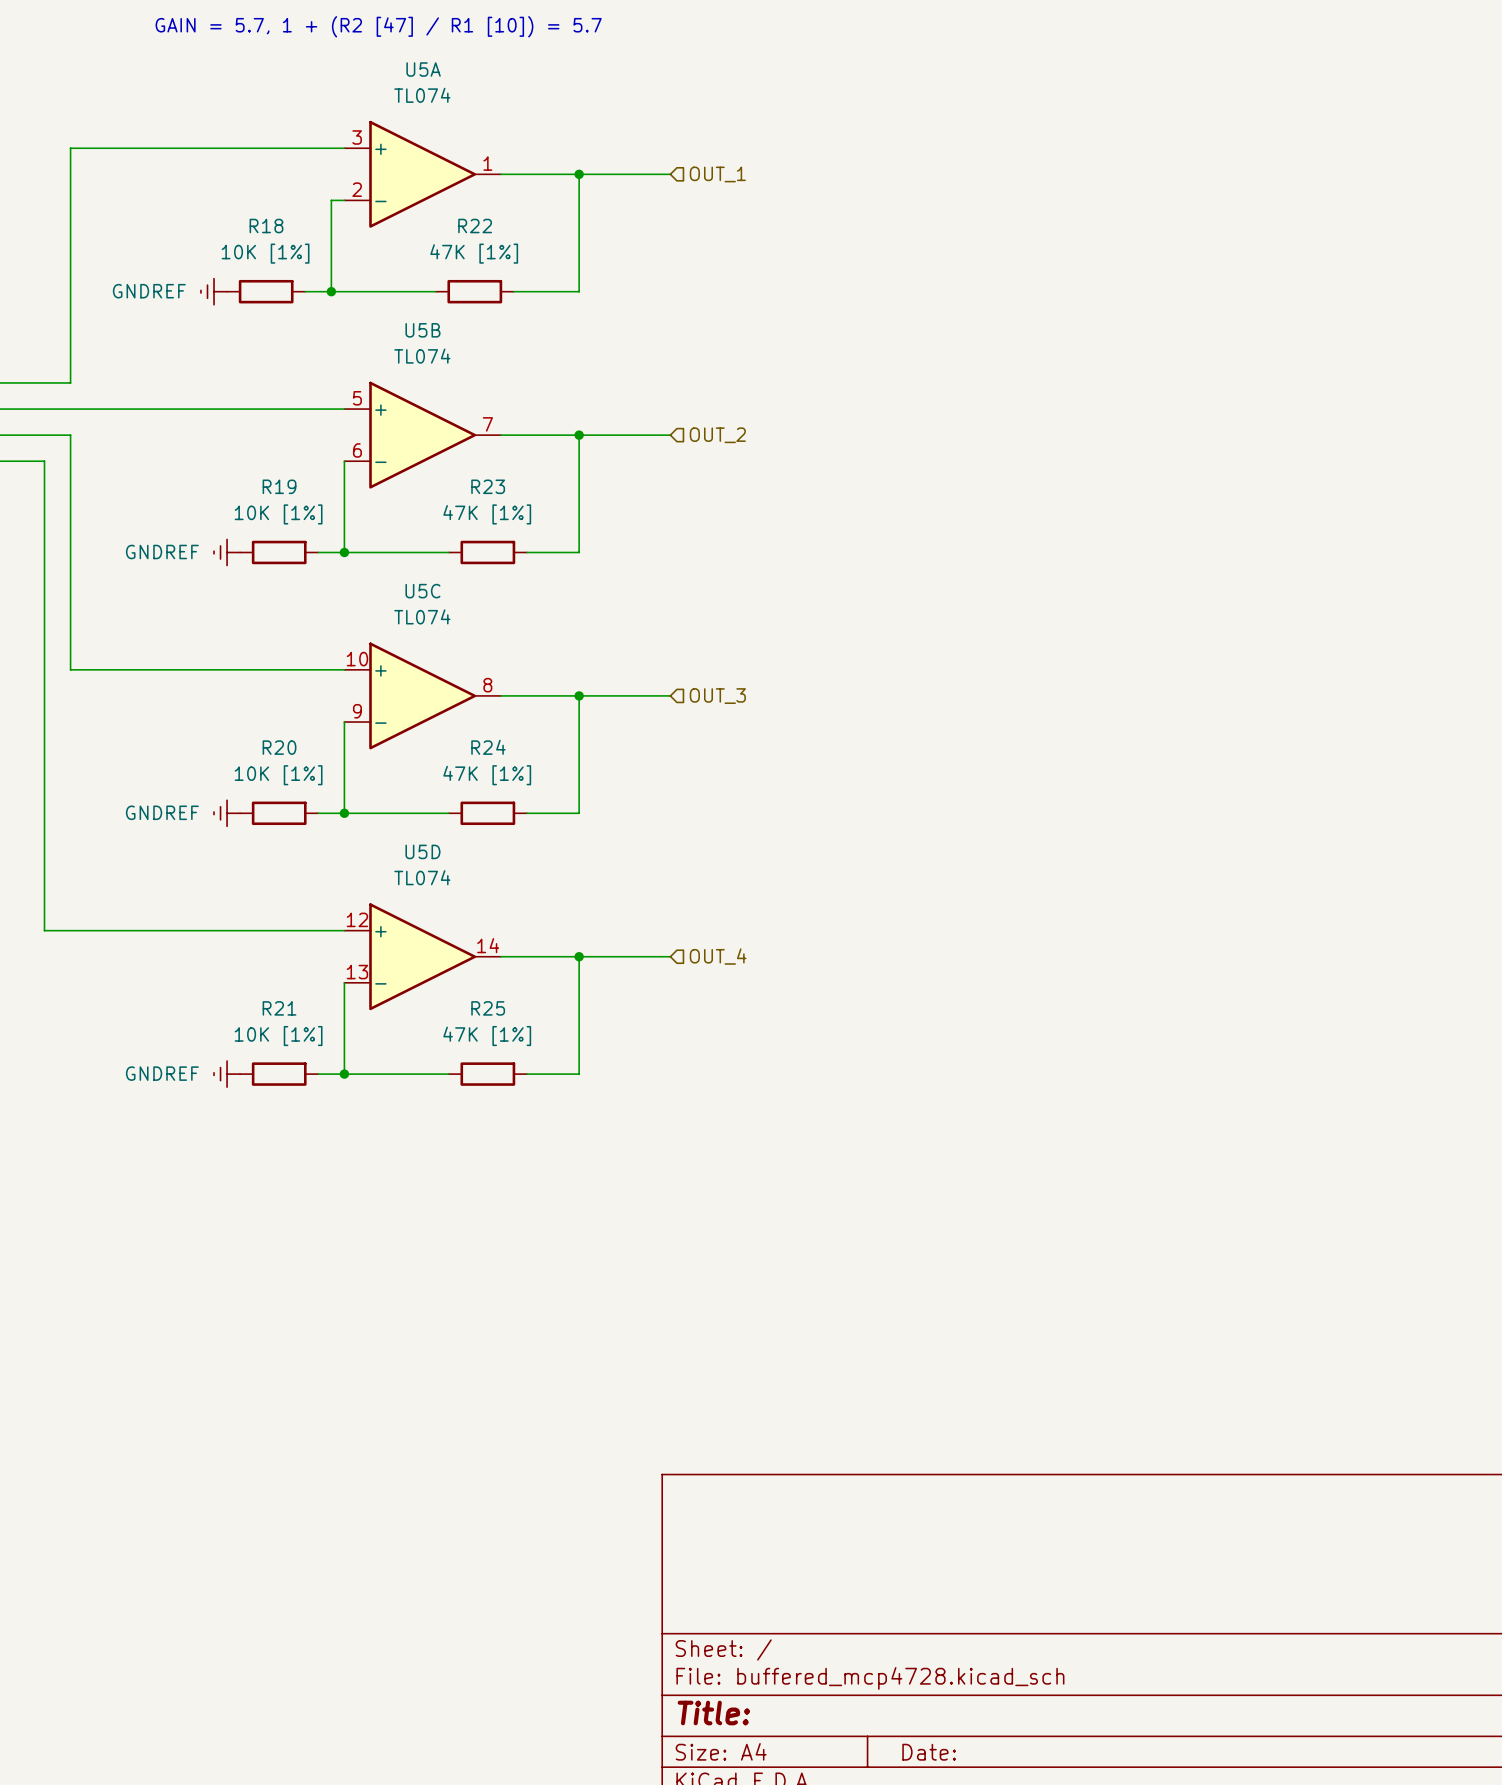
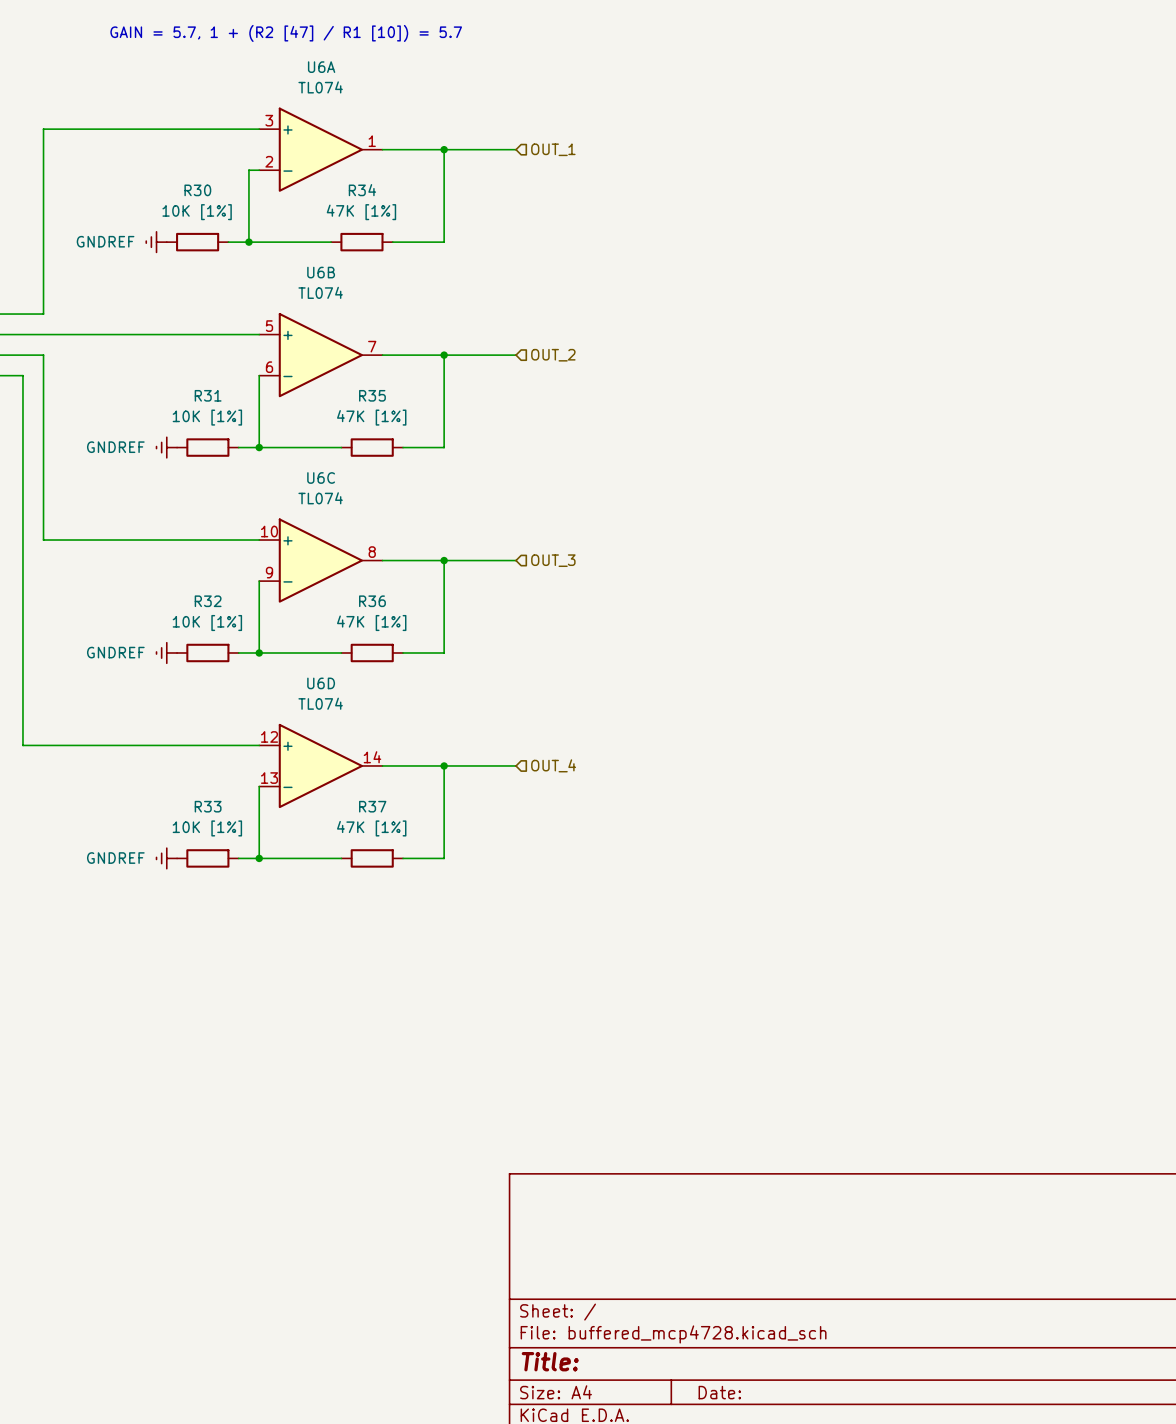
U5A name: U5A (423, 69) -> U6A (321, 67)
R18 name: R18 (266, 226) -> R30 (197, 190)
R22 name: R22 (475, 226) -> R34 (362, 190)
U5B name: U5B (422, 330) -> U6B (321, 272)
R19 name: R19 (279, 486) -> R31 (208, 395)
R23 name: R23 (488, 486) -> R35 (372, 395)
U5C name: U5C (422, 591) -> U6C (321, 477)
R20 name: R20 (279, 747) -> R32 (208, 601)
R24 name: R24 (488, 747) -> R36 (372, 601)
U5D name: U5D (422, 851) -> U6D (321, 683)
R21 name: R21 (279, 1008) -> R33 (208, 806)
R25 name: R25 (488, 1008) -> R37 (372, 806)

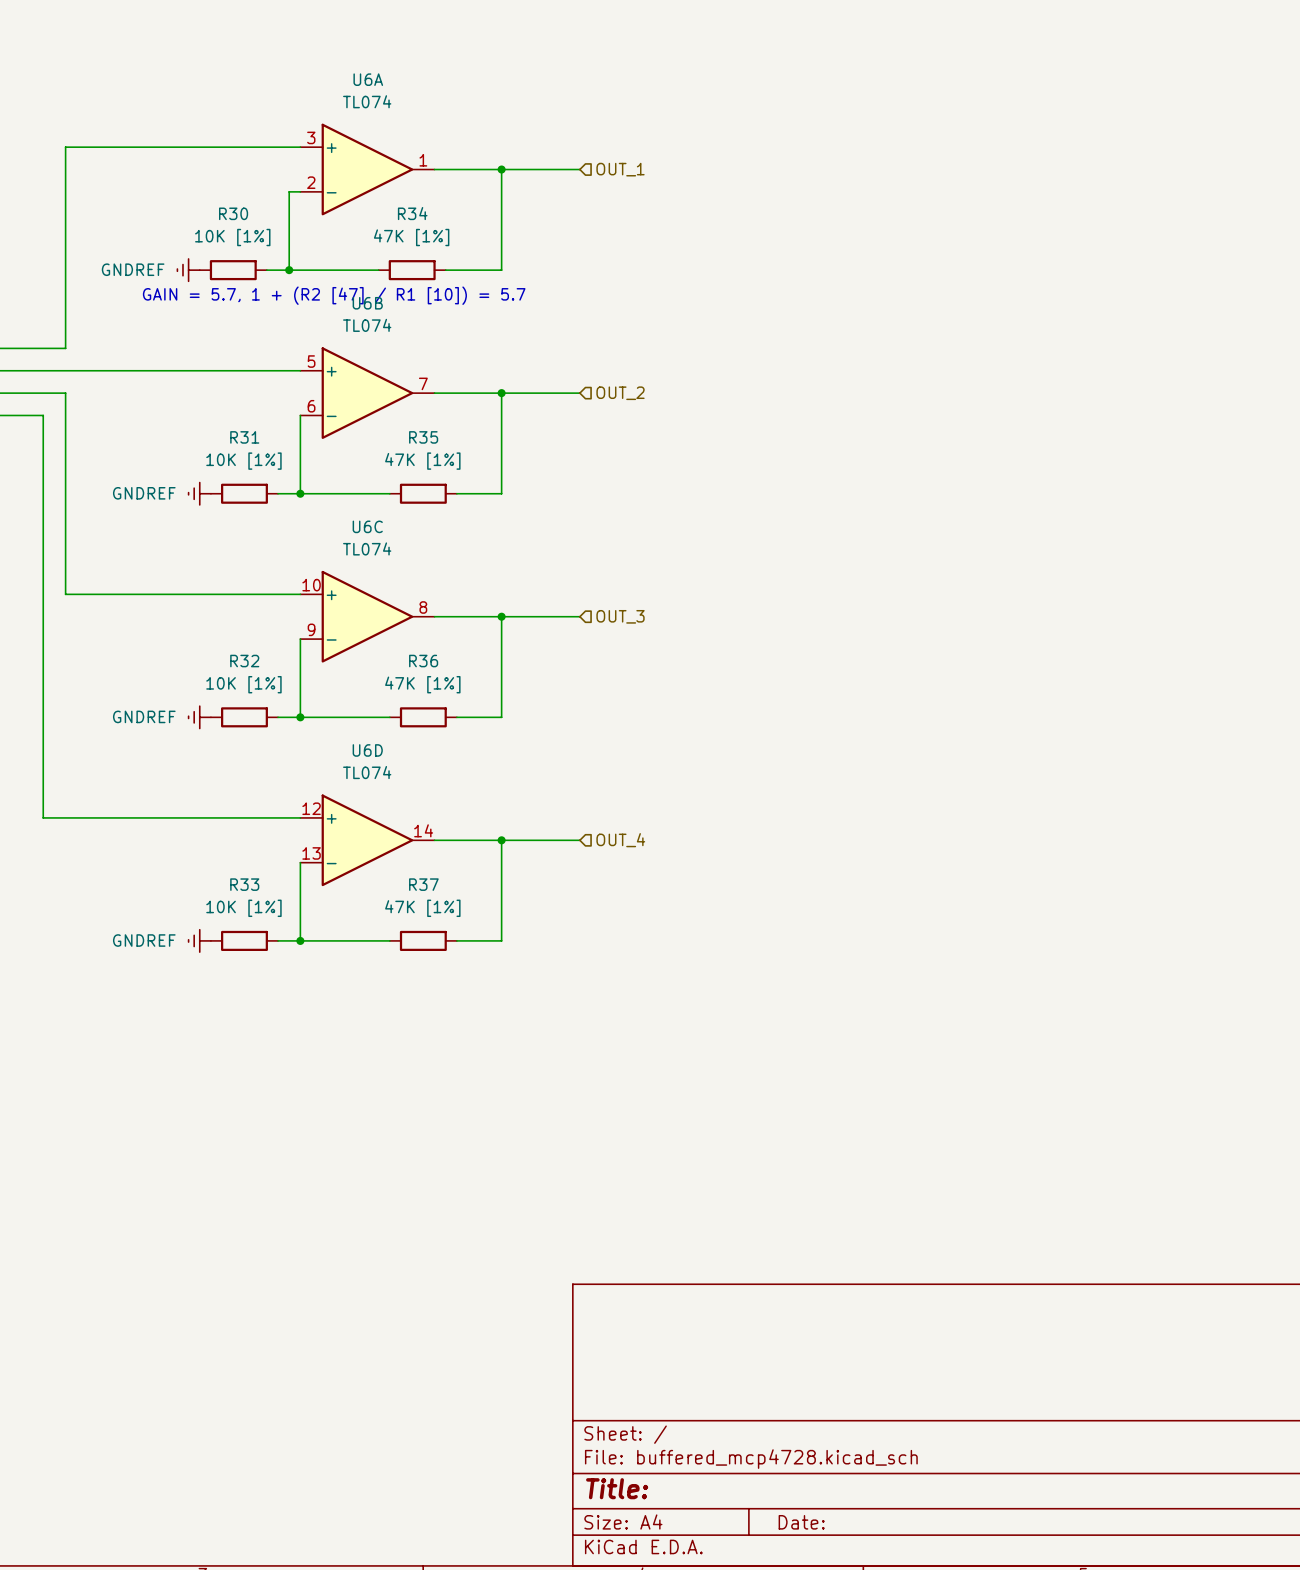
text: GAIN = 5.7, 1 + (R2 [47] / R1 [10]) = 5.7 (286, 33) -> none
text: none -> GAIN = 5.7, 1 + (R2 [47] / R1 [10]) = 5.7 (334, 295)

